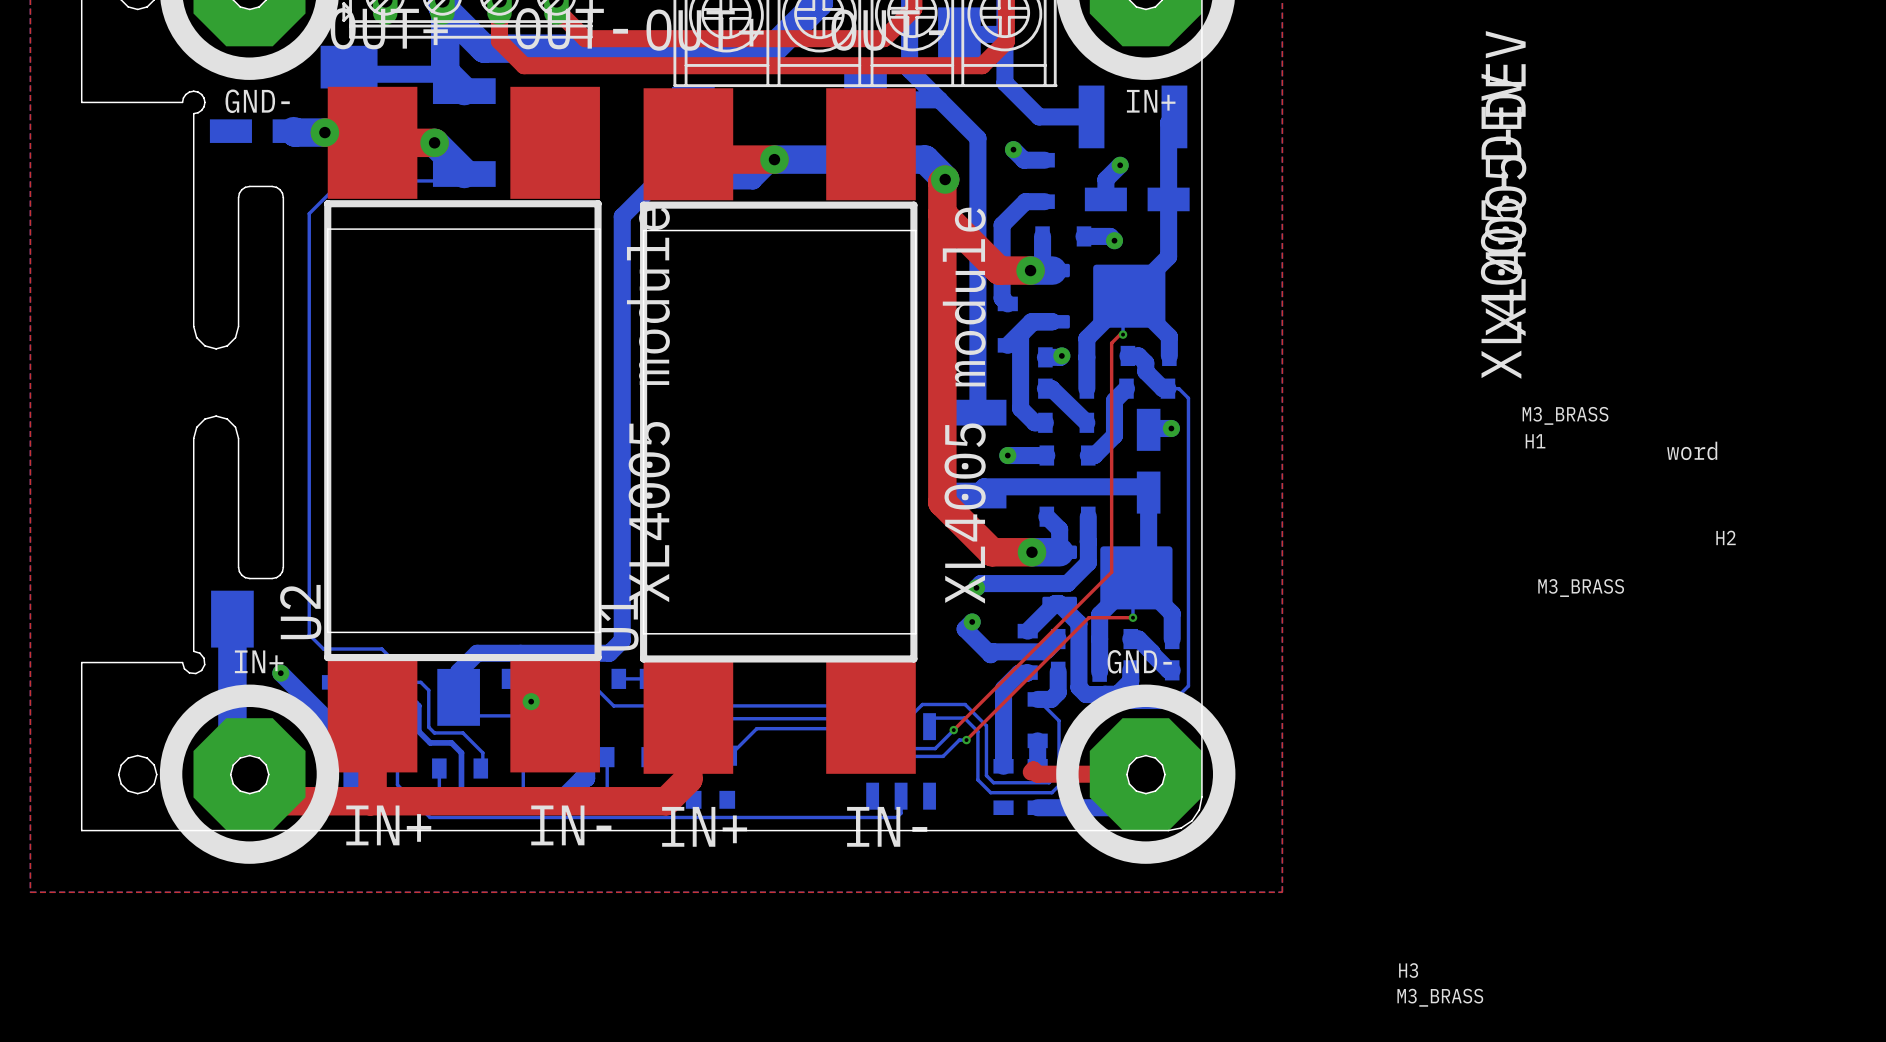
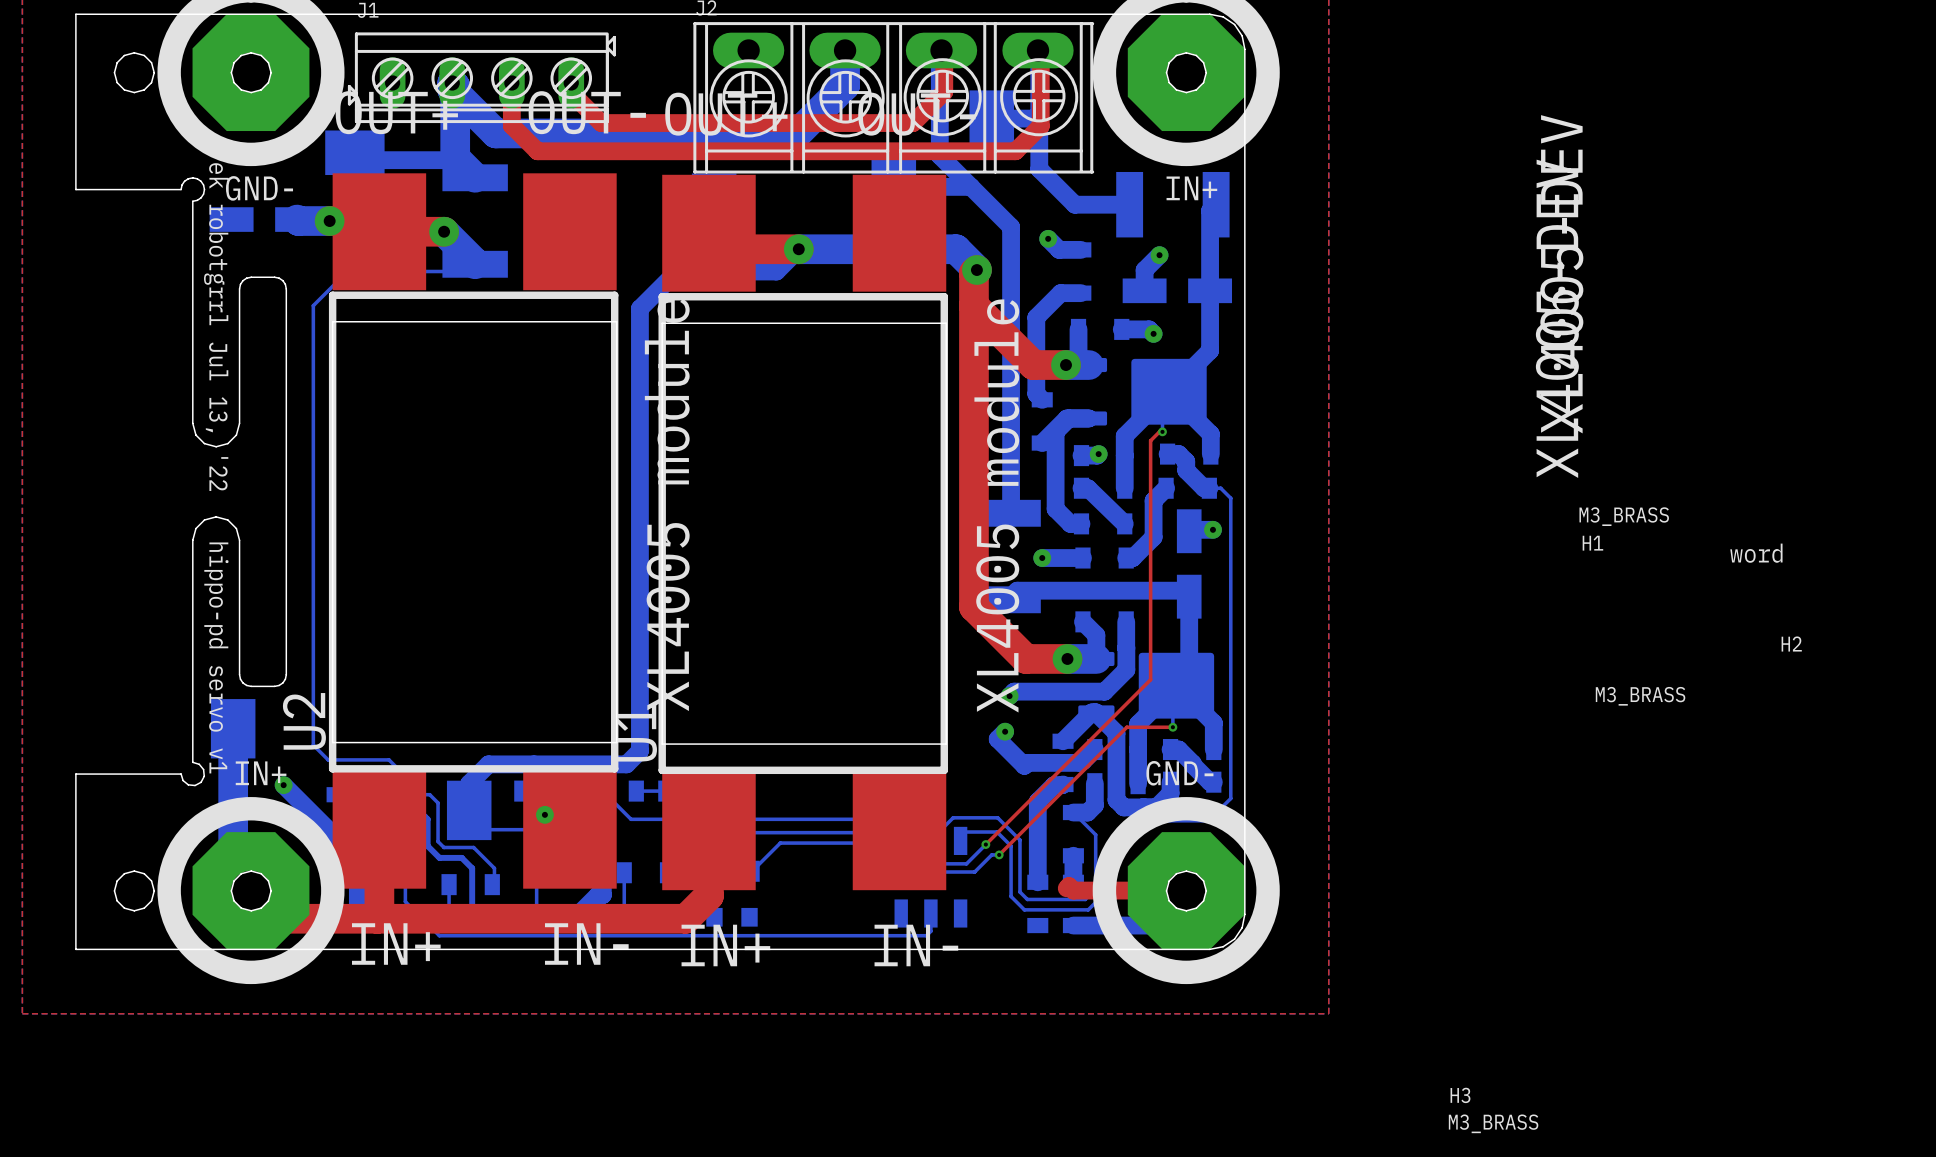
text: none -> ek robotgrrl Jul 13, '22 (216, 327)
text: none -> hippo-pd servo v1 (216, 657)

